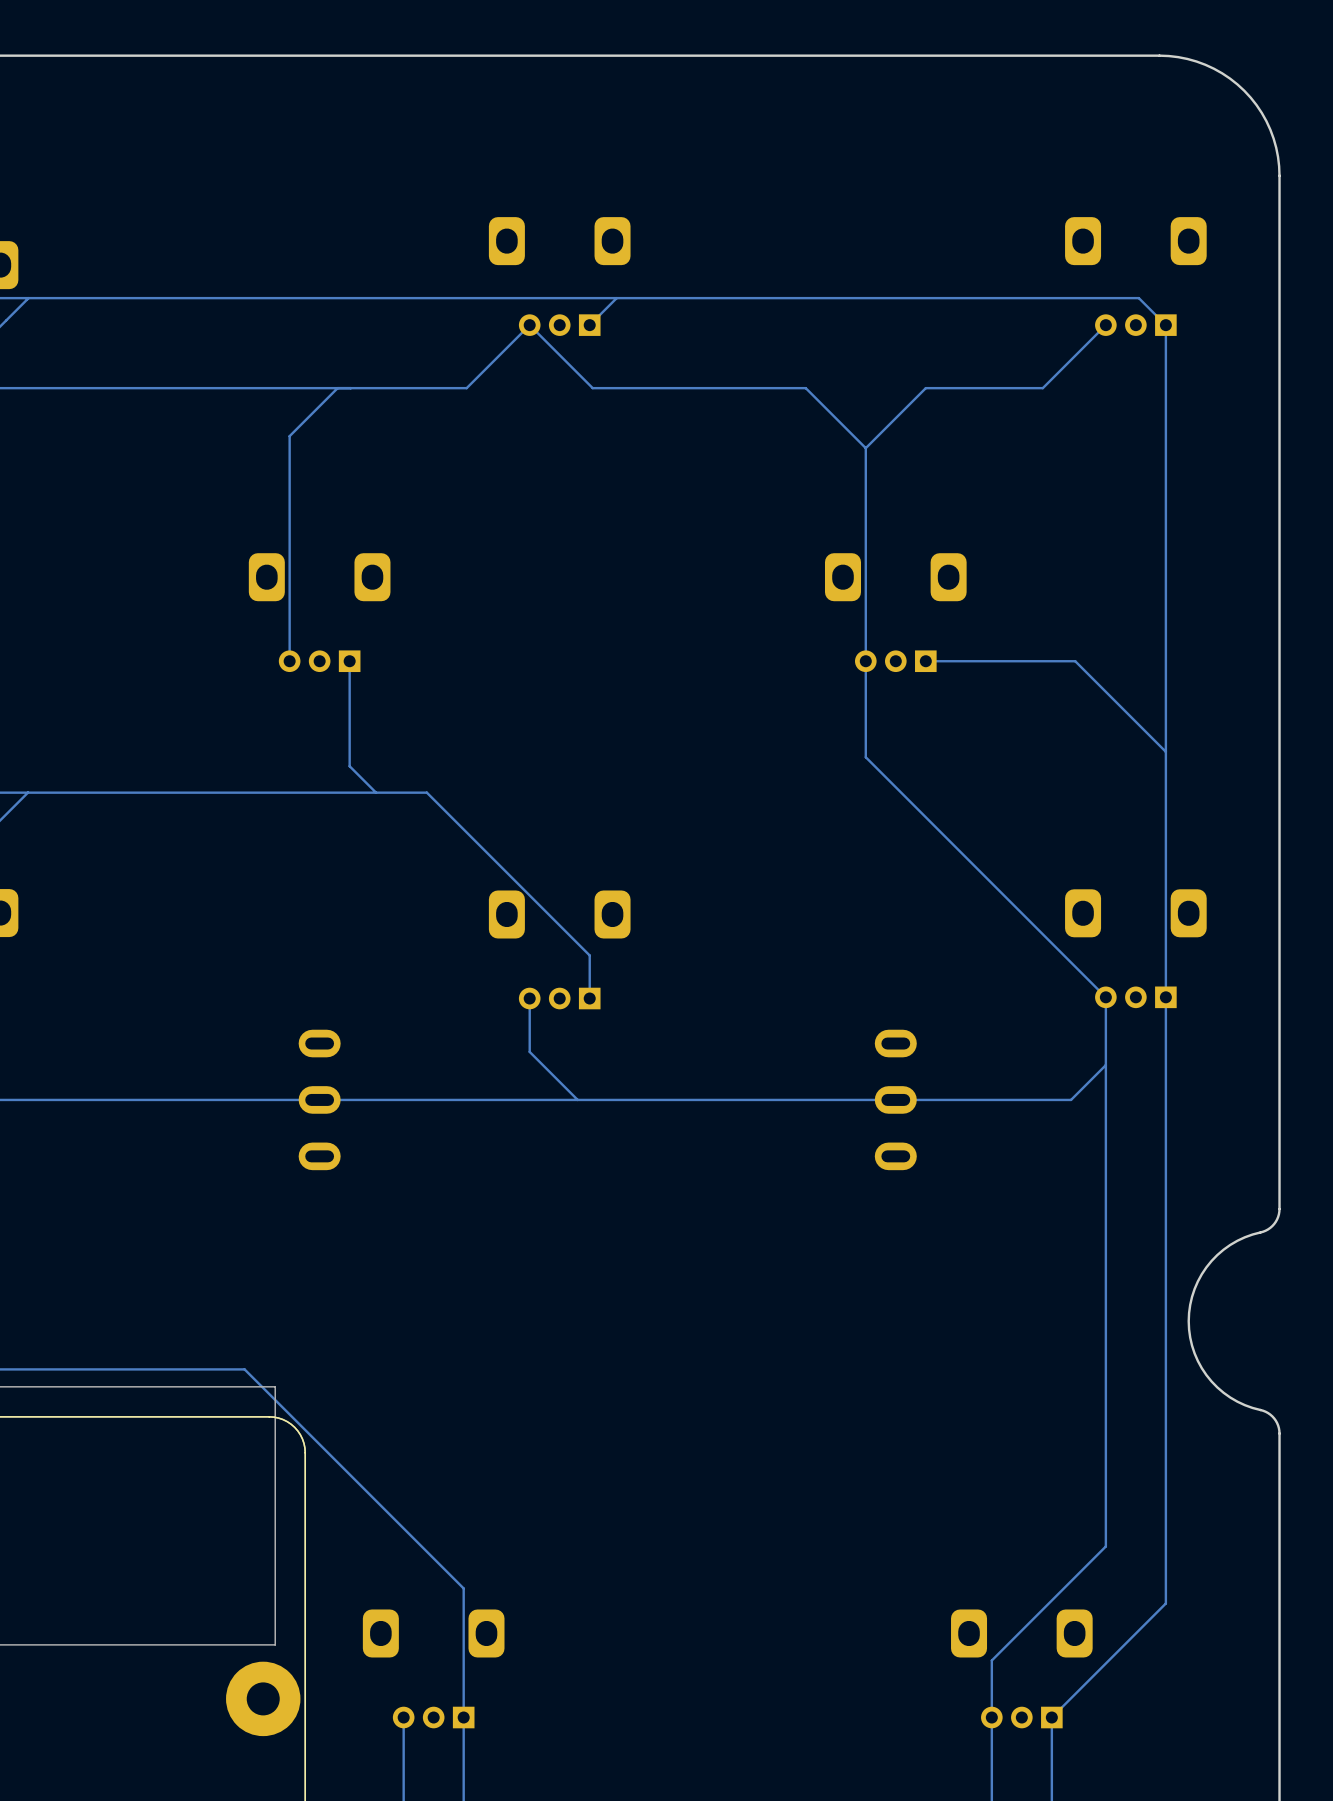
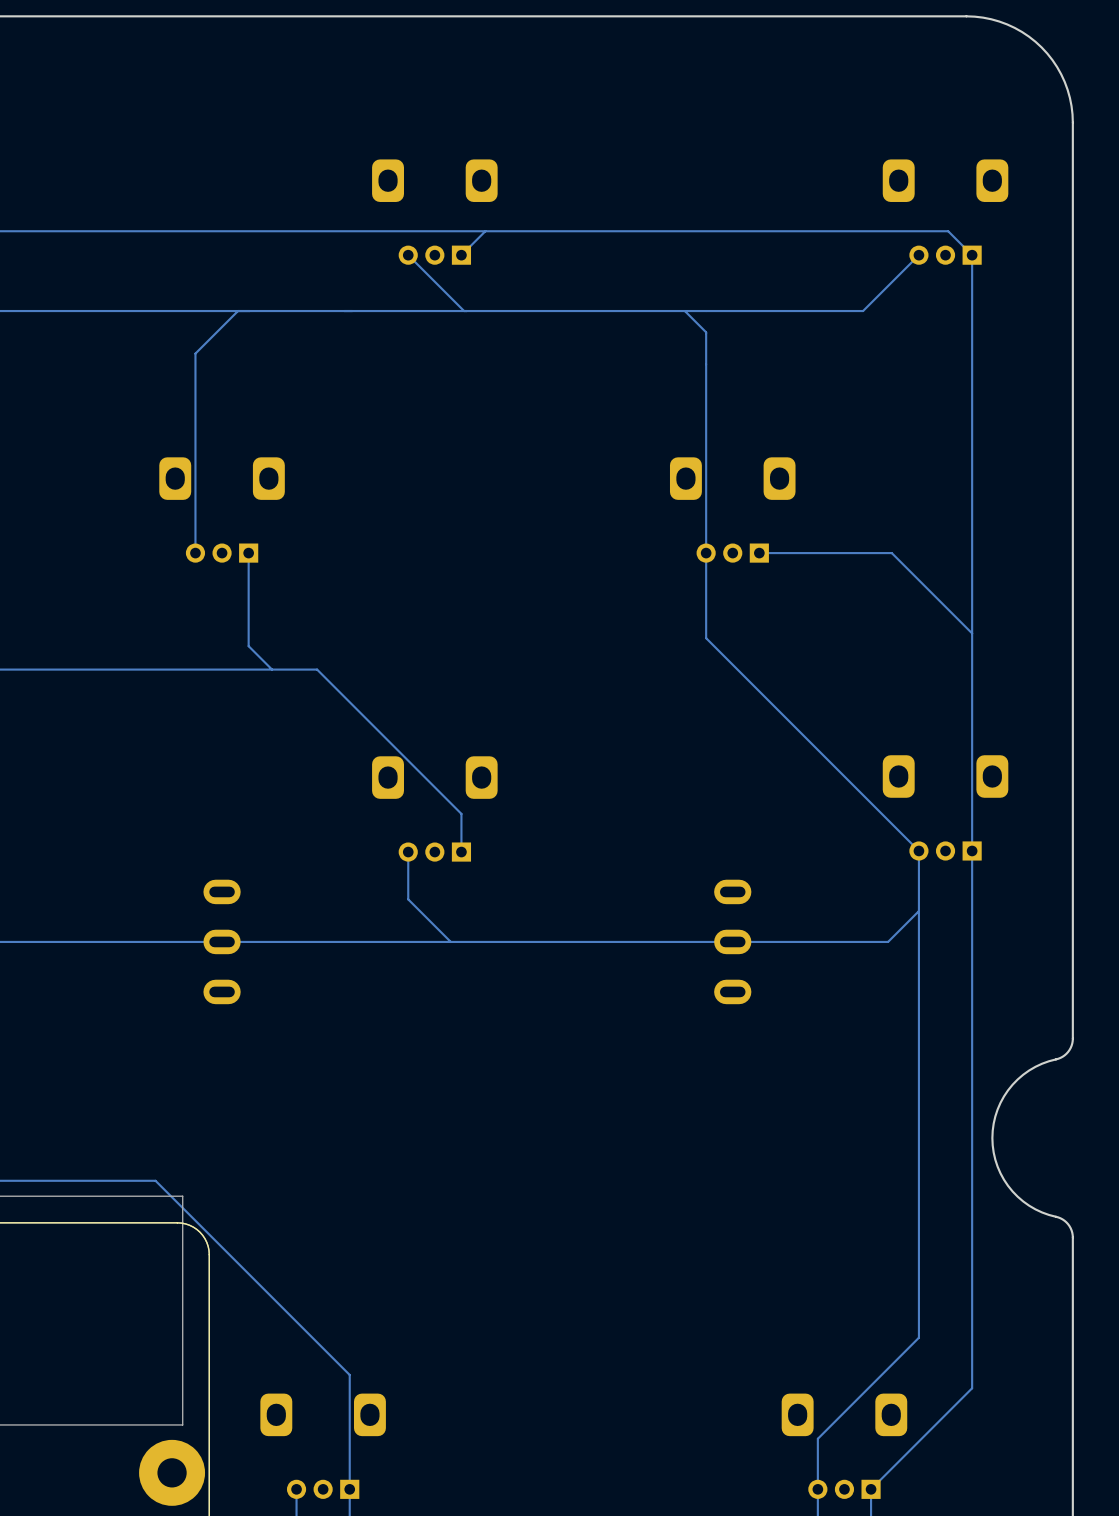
track: (529, 325) (466, 388) -> (464, 311) (352, 311)
track: none -> (684, 311) (706, 332) (706, 364)
track: (925, 388) (865, 448) (805, 388) -> (759, 311) (652, 311)

